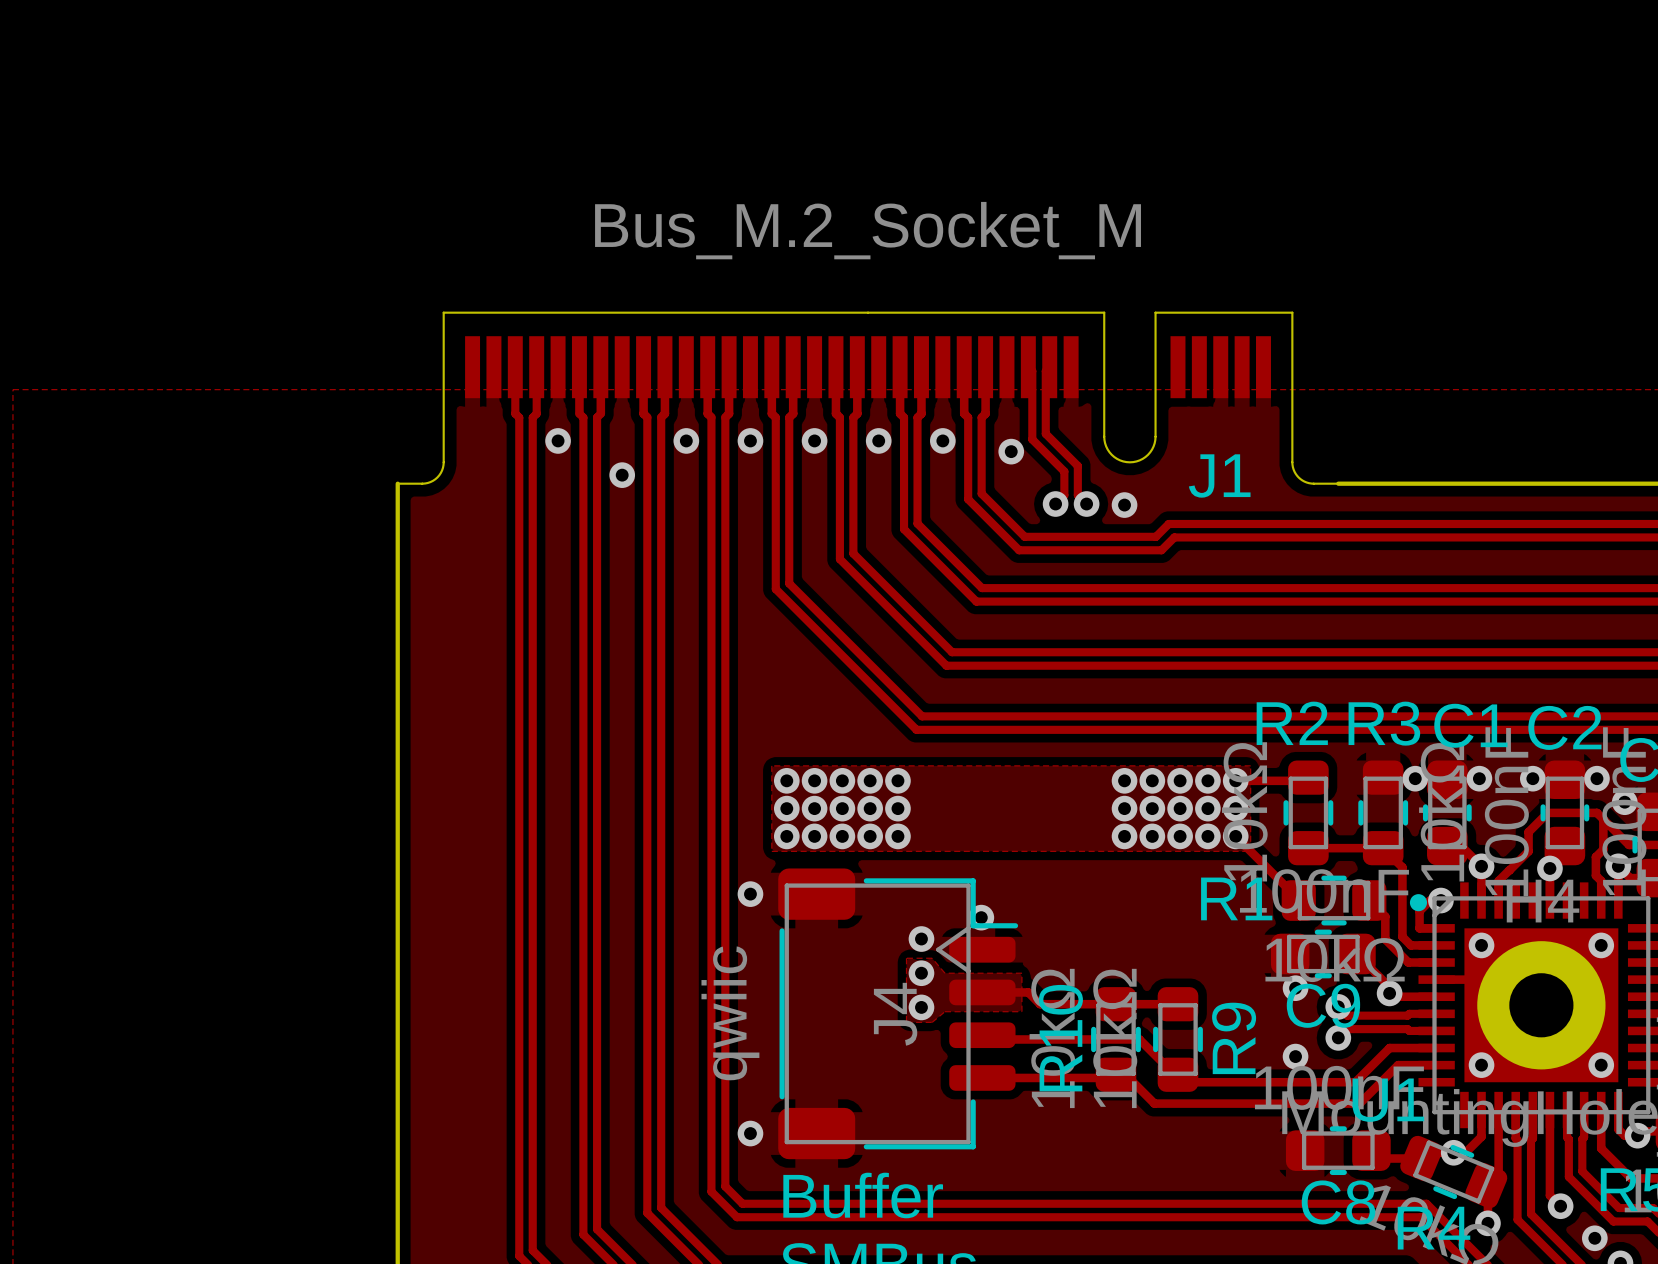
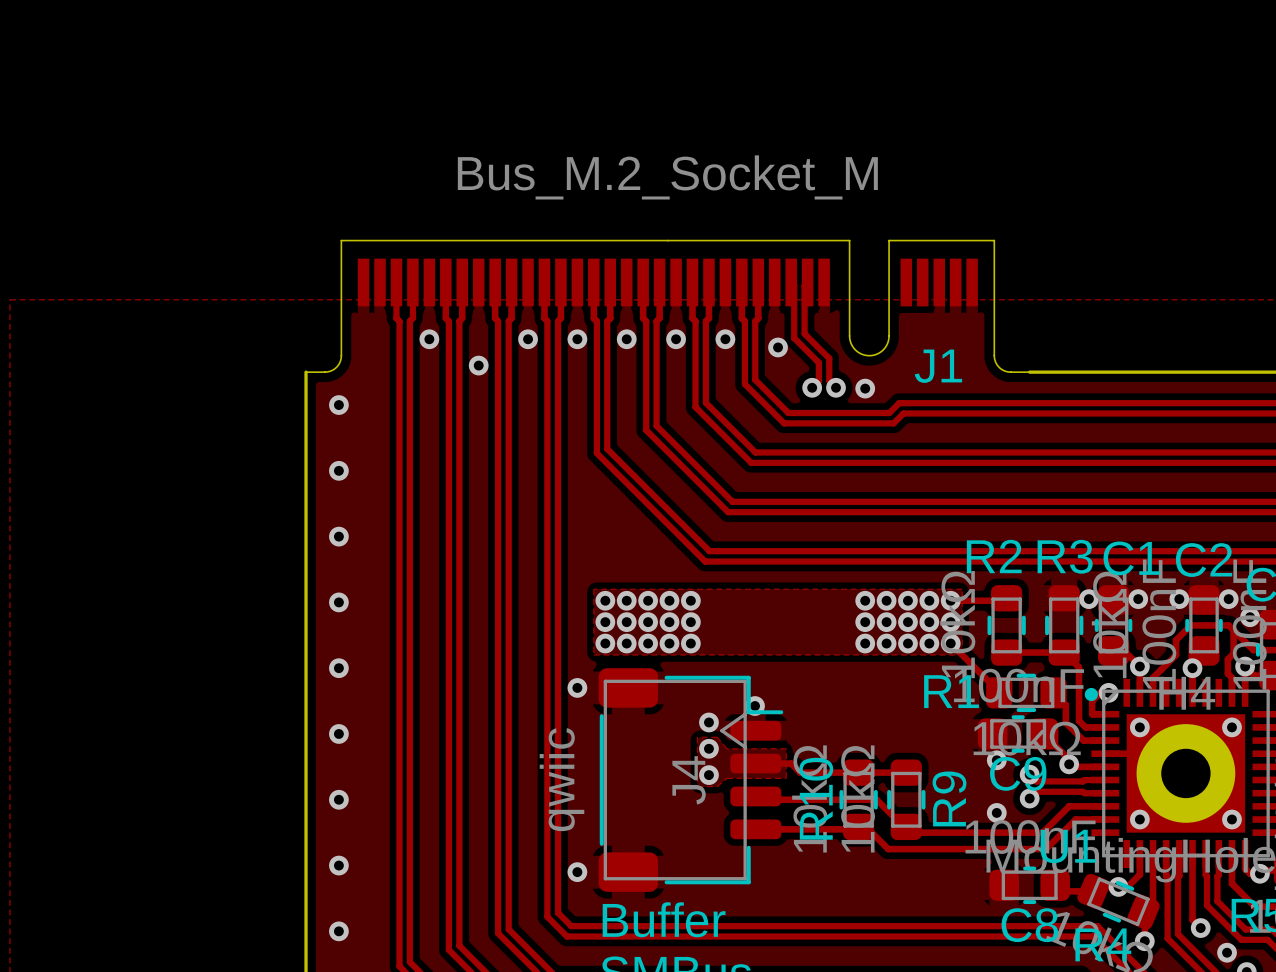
via: none -> (338, 405)
via: none -> (338, 470)
via: none -> (338, 536)
via: none -> (338, 602)
via: none -> (338, 668)
via: none -> (338, 733)
via: none -> (338, 799)
via: none -> (338, 865)
via: none -> (338, 931)

